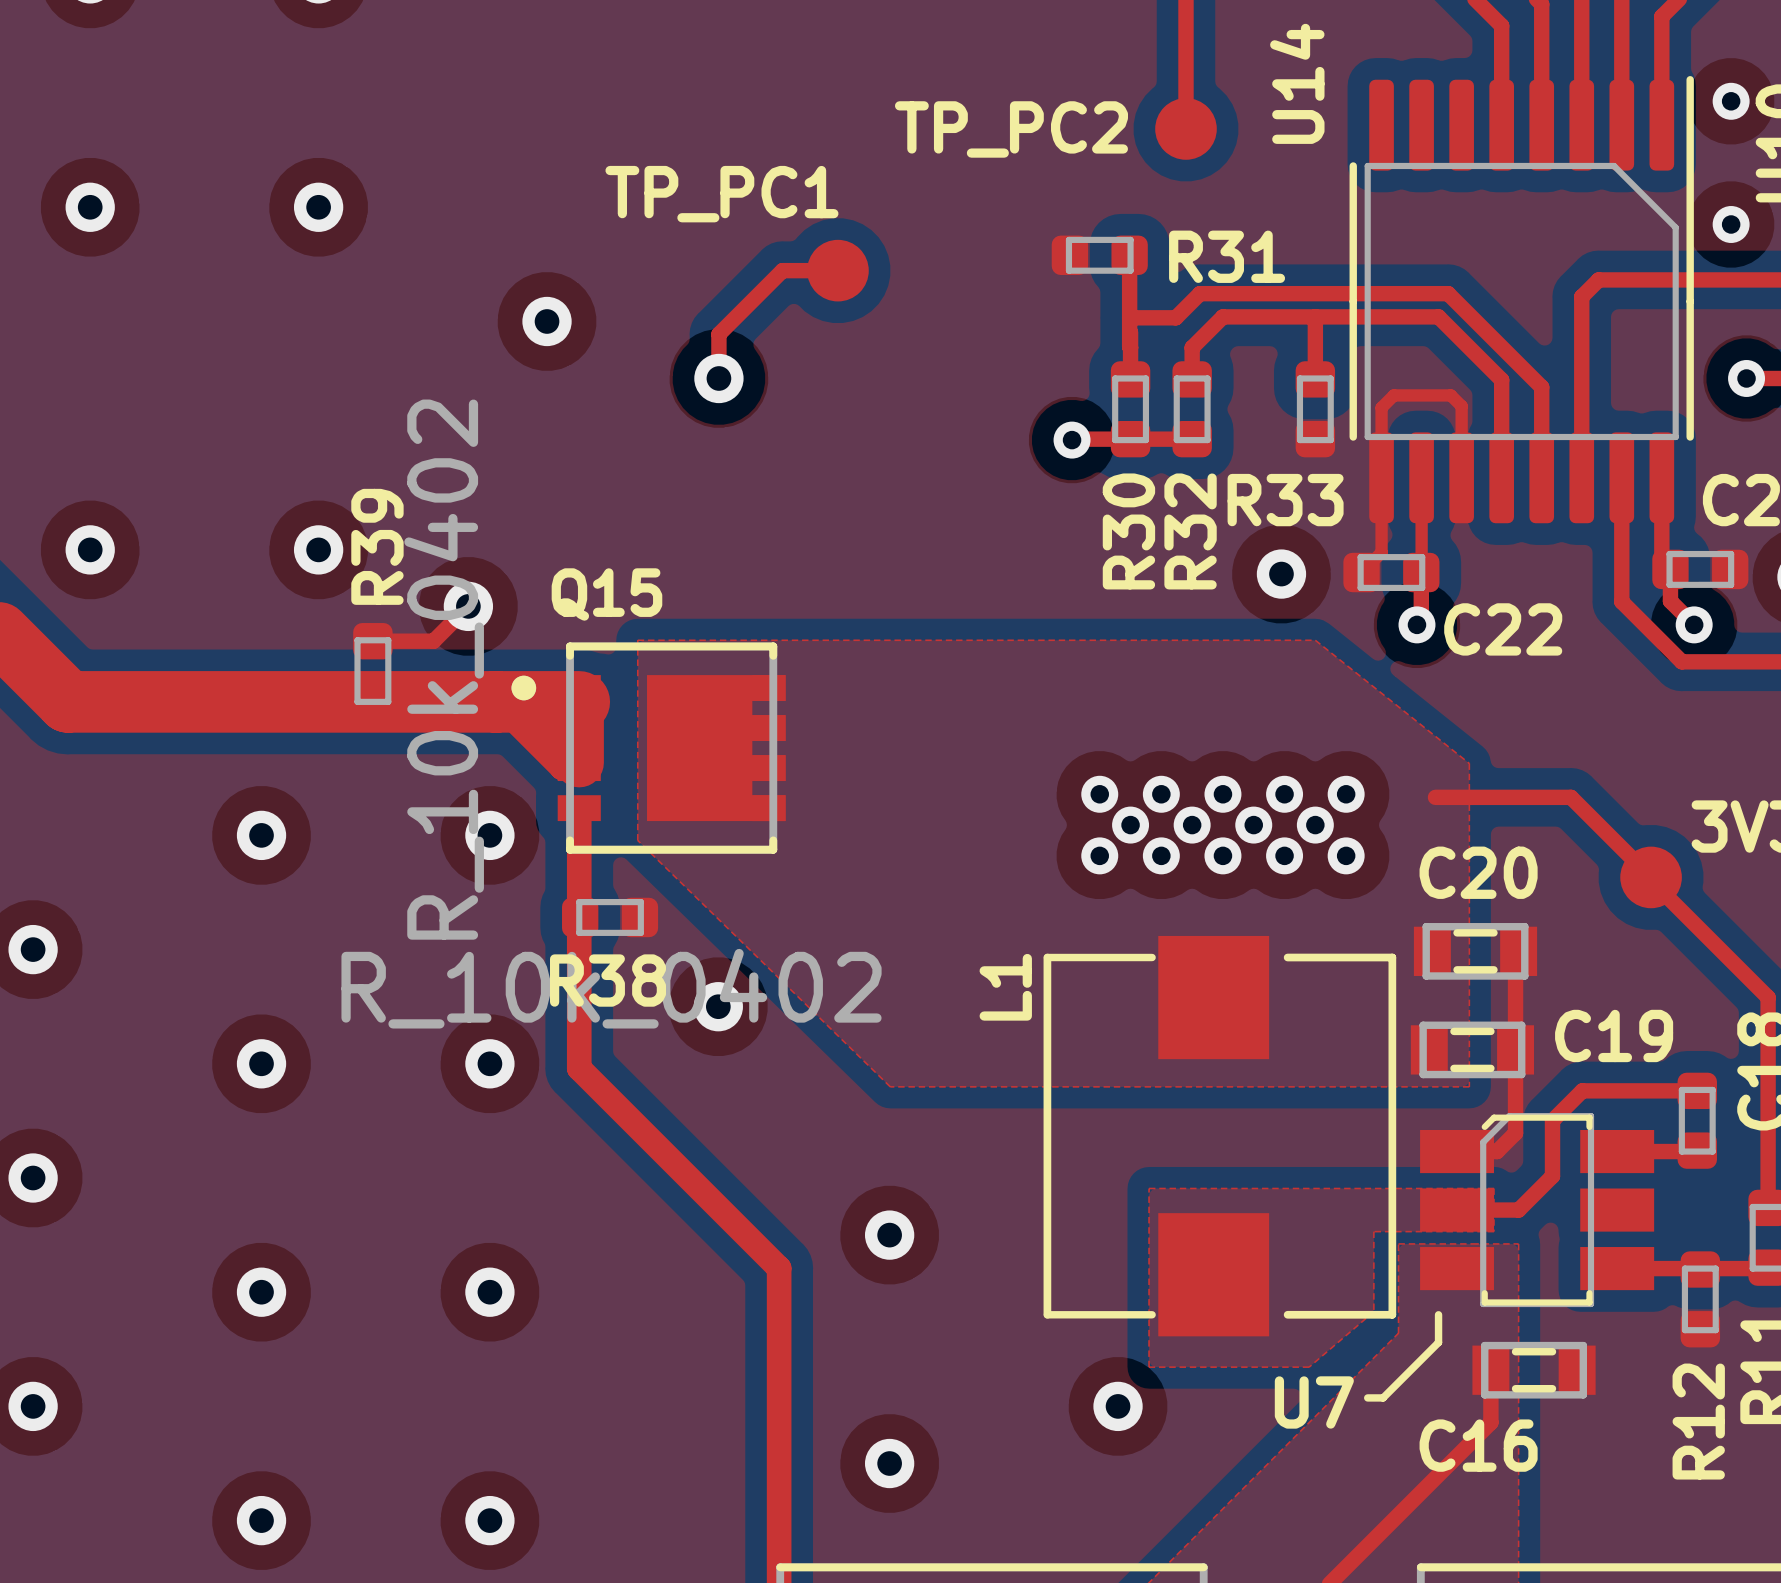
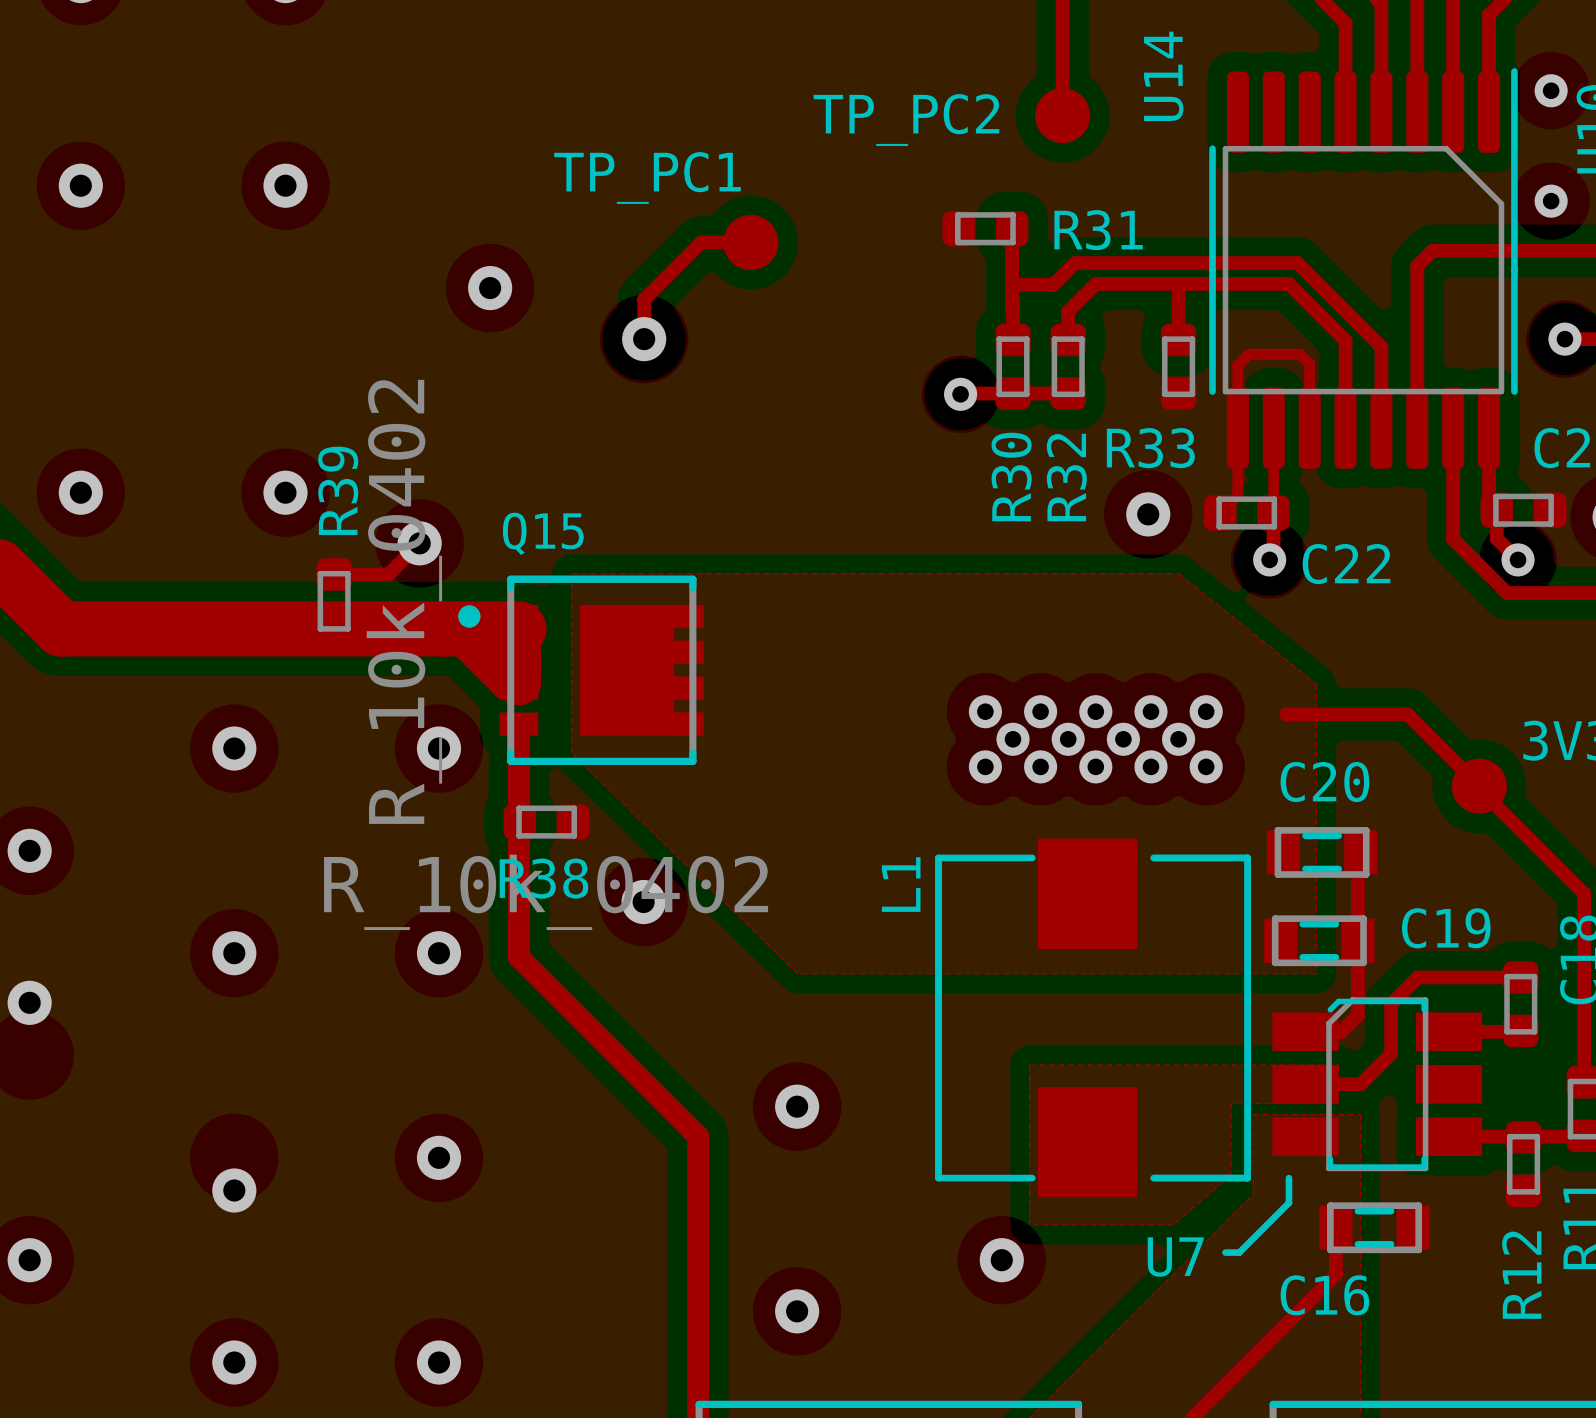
via position: (33, 1178) -> (29, 1002)
via position: (261, 1292) -> (234, 1190)

